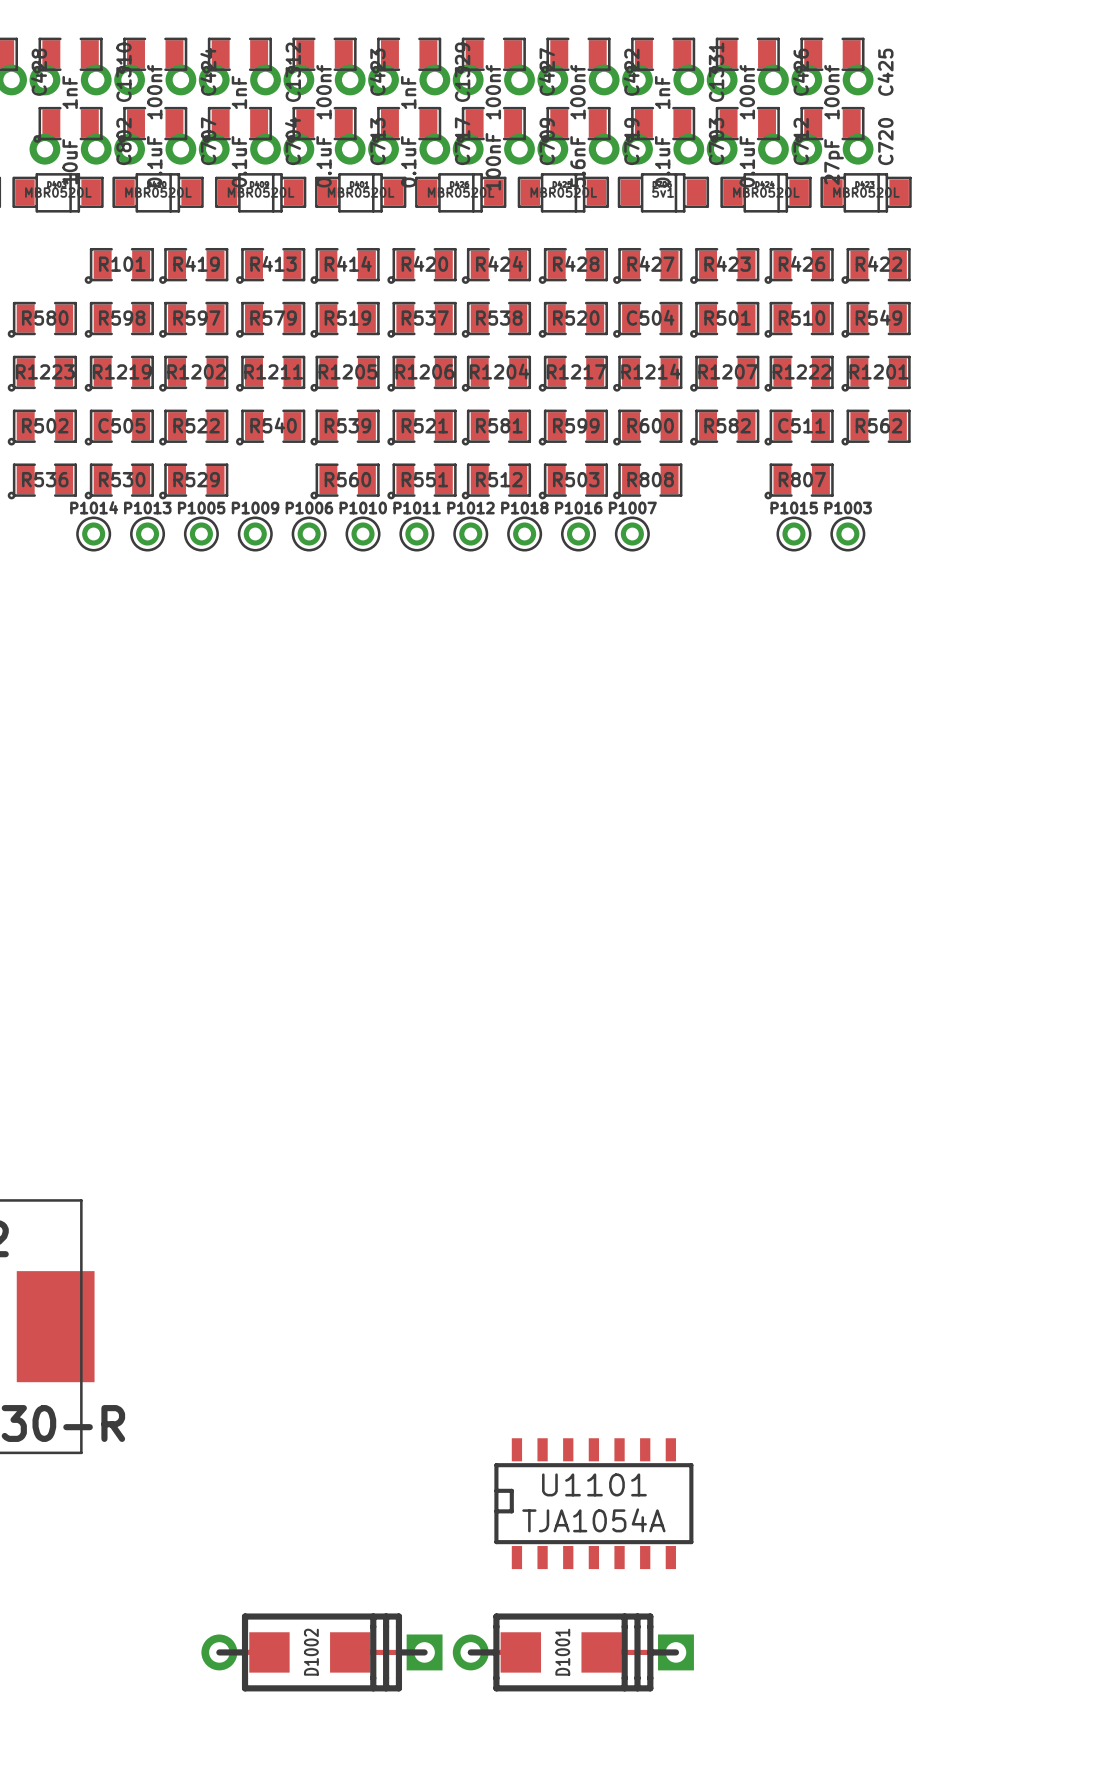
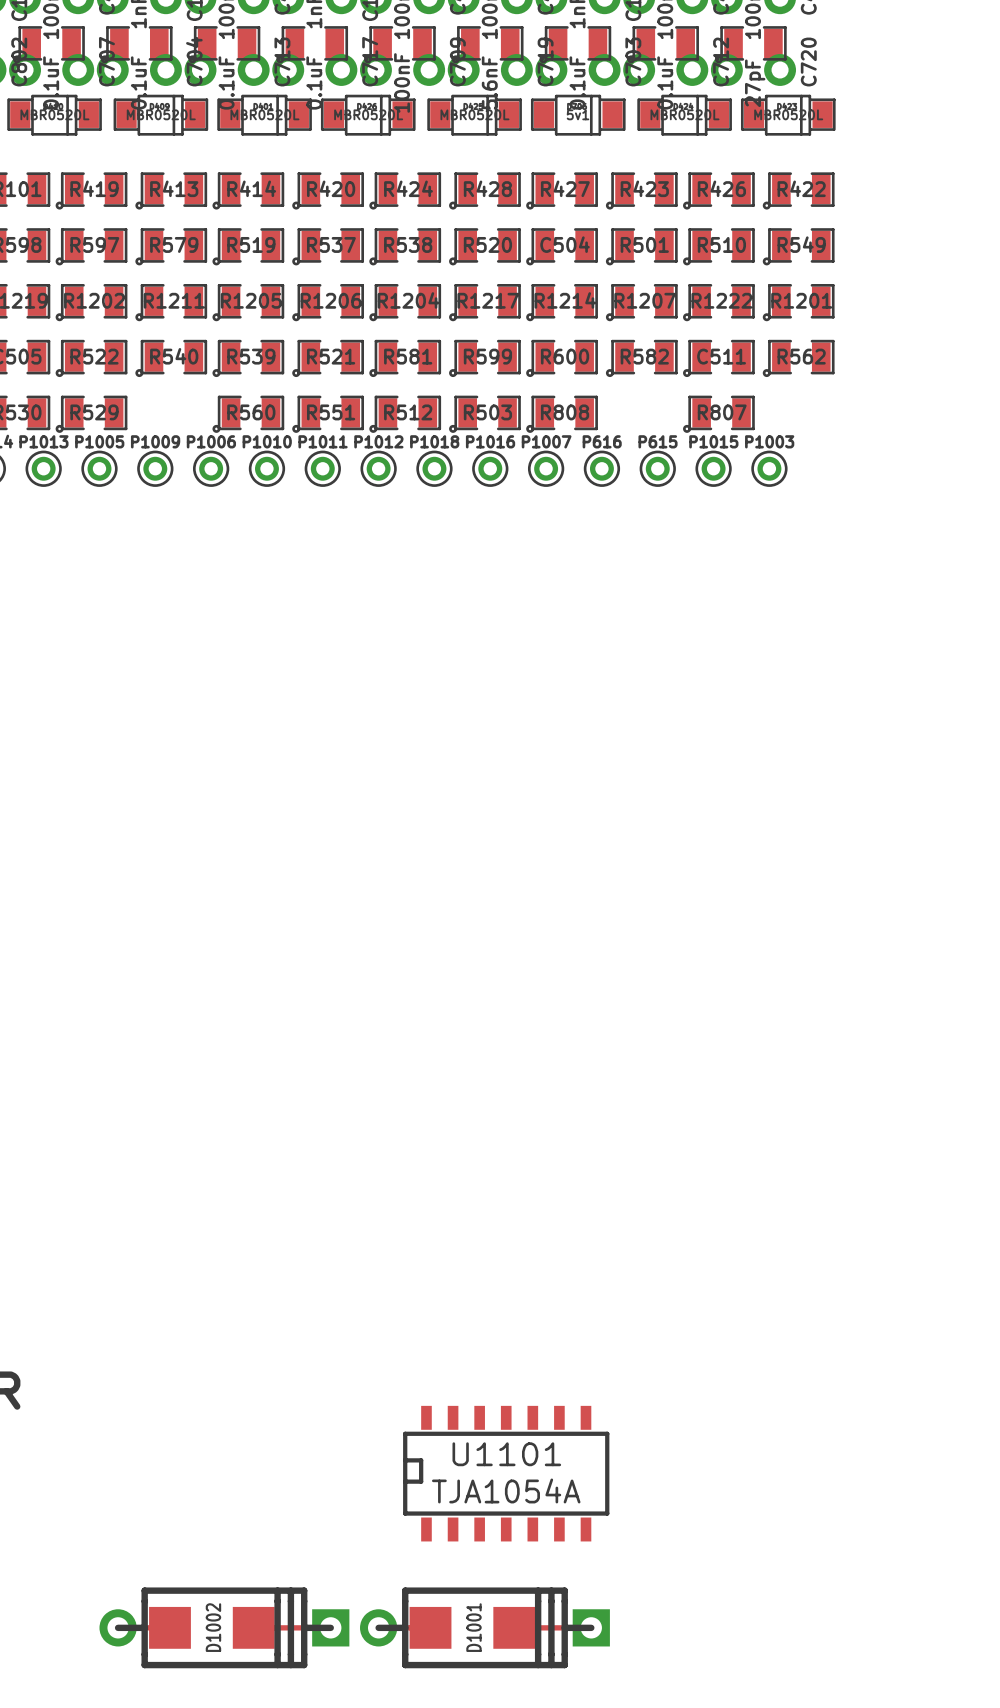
P616: none -> (601, 468)
P615: none -> (657, 468)

